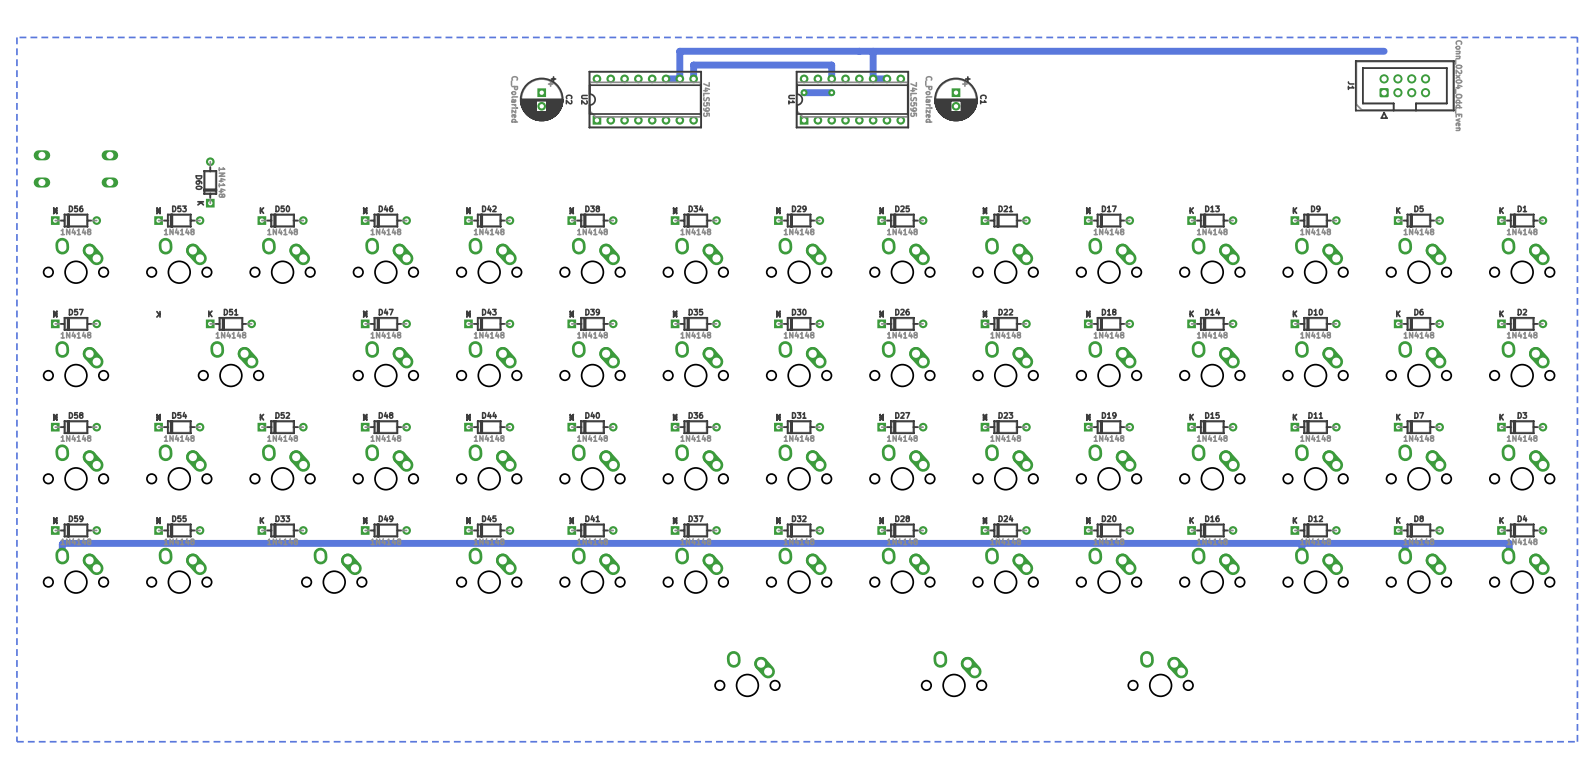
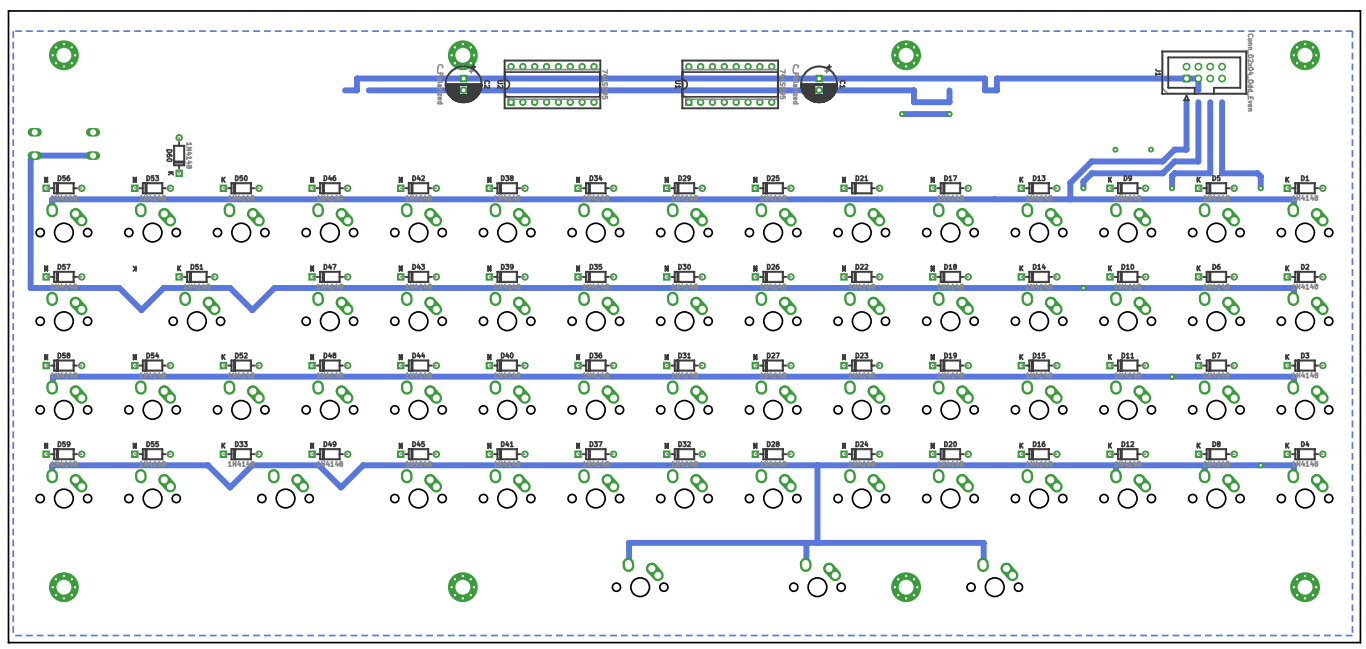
board edge: none -> (1360, 10) (8, 10) (8, 642) (1360, 642) (1360, 10)
track: (873, 51) (873, 78) (886, 78) -> none
track: (1384, 51) (679, 51) (679, 78) (666, 78) -> none
part: none -> (63, 55)
part: none -> (462, 55)
part: none -> (906, 55)
part: none -> (1305, 55)
track: (831, 78) (831, 65) (693, 65) (693, 78) -> none
track: none -> (688, 78) (356, 78) (356, 90) (345, 90)
via: (804, 92) -> none
track: none -> (712, 78) (985, 78) (985, 90) (996, 90) (996, 78) (1198, 78) (1198, 90)
via: (831, 92) -> none
track: none -> (949, 90) (949, 102) (913, 102) (913, 90) (368, 90)
track: none -> (1186, 102) (1186, 149) (1174, 149) (1162, 161) (1091, 161) (1070, 182) (1070, 199)
track: none -> (1198, 102) (1198, 161) (1174, 161) (1162, 173) (1091, 173) (1083, 181) (1083, 188)
track: none -> (1210, 102) (1210, 173) (1174, 173) (1172, 175) (1172, 188)
track: none -> (1222, 102) (1222, 173) (1257, 173) (1260, 176) (1260, 188)
via: none -> (902, 114)
track: none -> (949, 114) (902, 114)
via: none -> (949, 114)
via: none -> (1115, 149)
via: none -> (1150, 149)
track: none -> (93, 155) (34, 155) (30, 159) (30, 287) (119, 287) (141, 310) (163, 287) (230, 287) (252, 310) (274, 287) (1293, 287) (1293, 298)
via: none -> (1083, 188)
via: none -> (1172, 188)
via: none -> (1260, 188)
track: none -> (1293, 210) (1293, 199) (52, 199) (52, 210)
via: none -> (1083, 287)
via: none -> (1172, 376)
track: none -> (1293, 387) (1293, 376) (52, 376) (52, 387)
track: (295, 543) (243, 543) -> (252, 465) (230, 487) (207, 465)
track: (424, 543) (372, 543) -> (363, 465) (340, 487) (318, 465)
track: none -> (817, 465) (817, 542)
via: none -> (1260, 465)
track: none -> (806, 542) (805, 564)
track: none -> (983, 564) (983, 542) (629, 542) (628, 564)
part: none -> (63, 587)
part: none -> (462, 587)
part: none -> (906, 587)
part: none -> (1305, 587)

